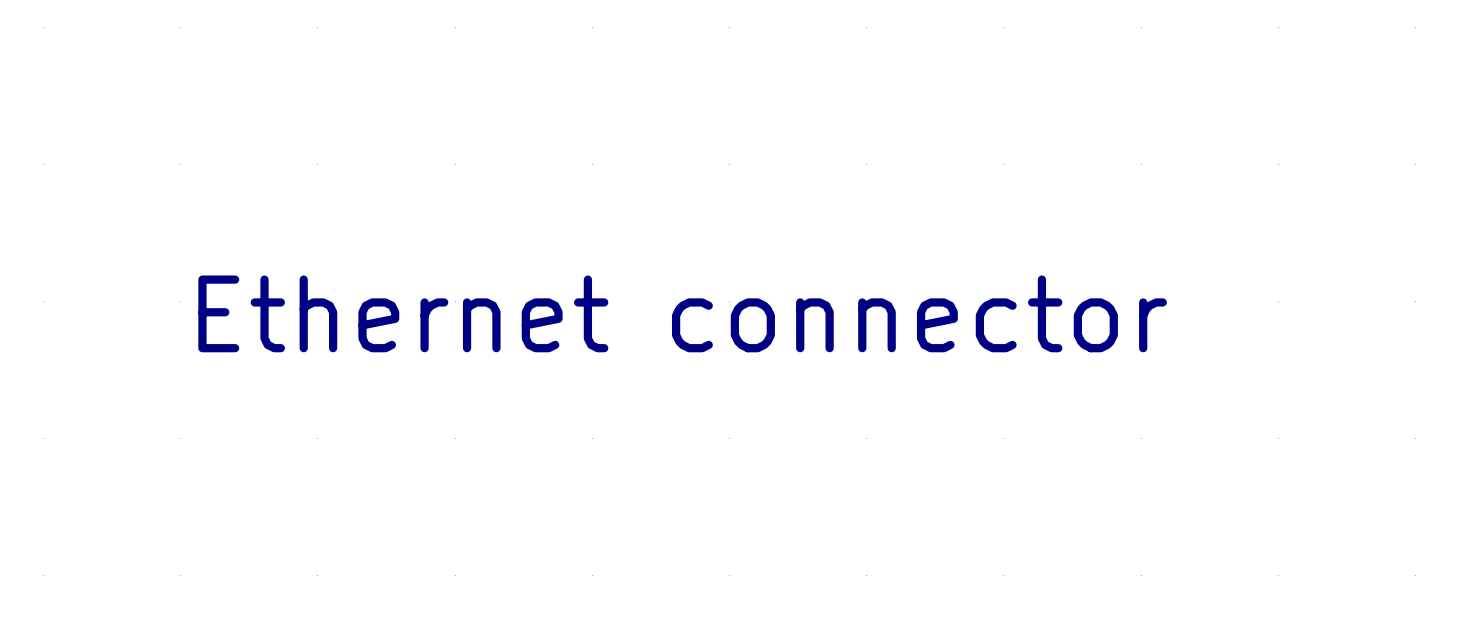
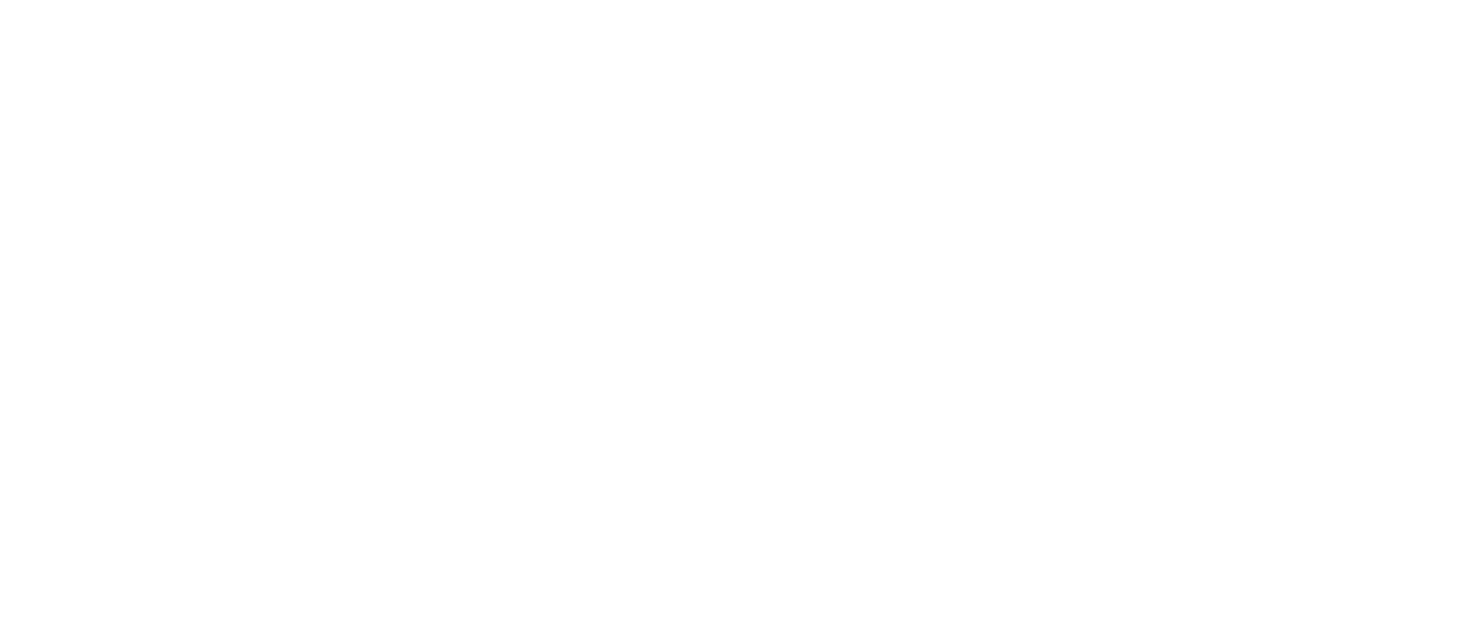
text: Ethernet connector (682, 313) -> none

